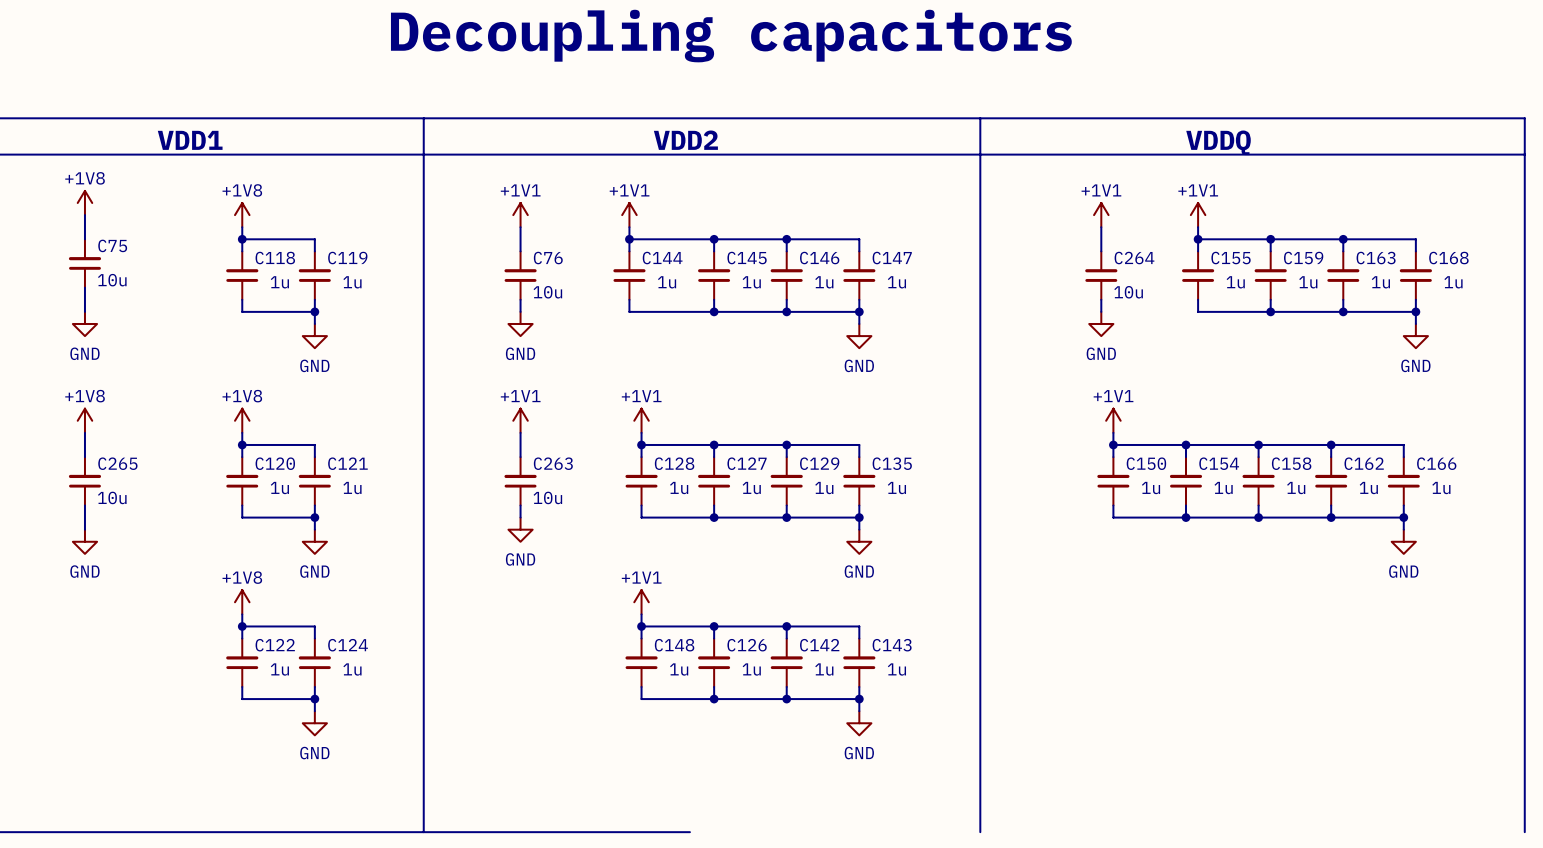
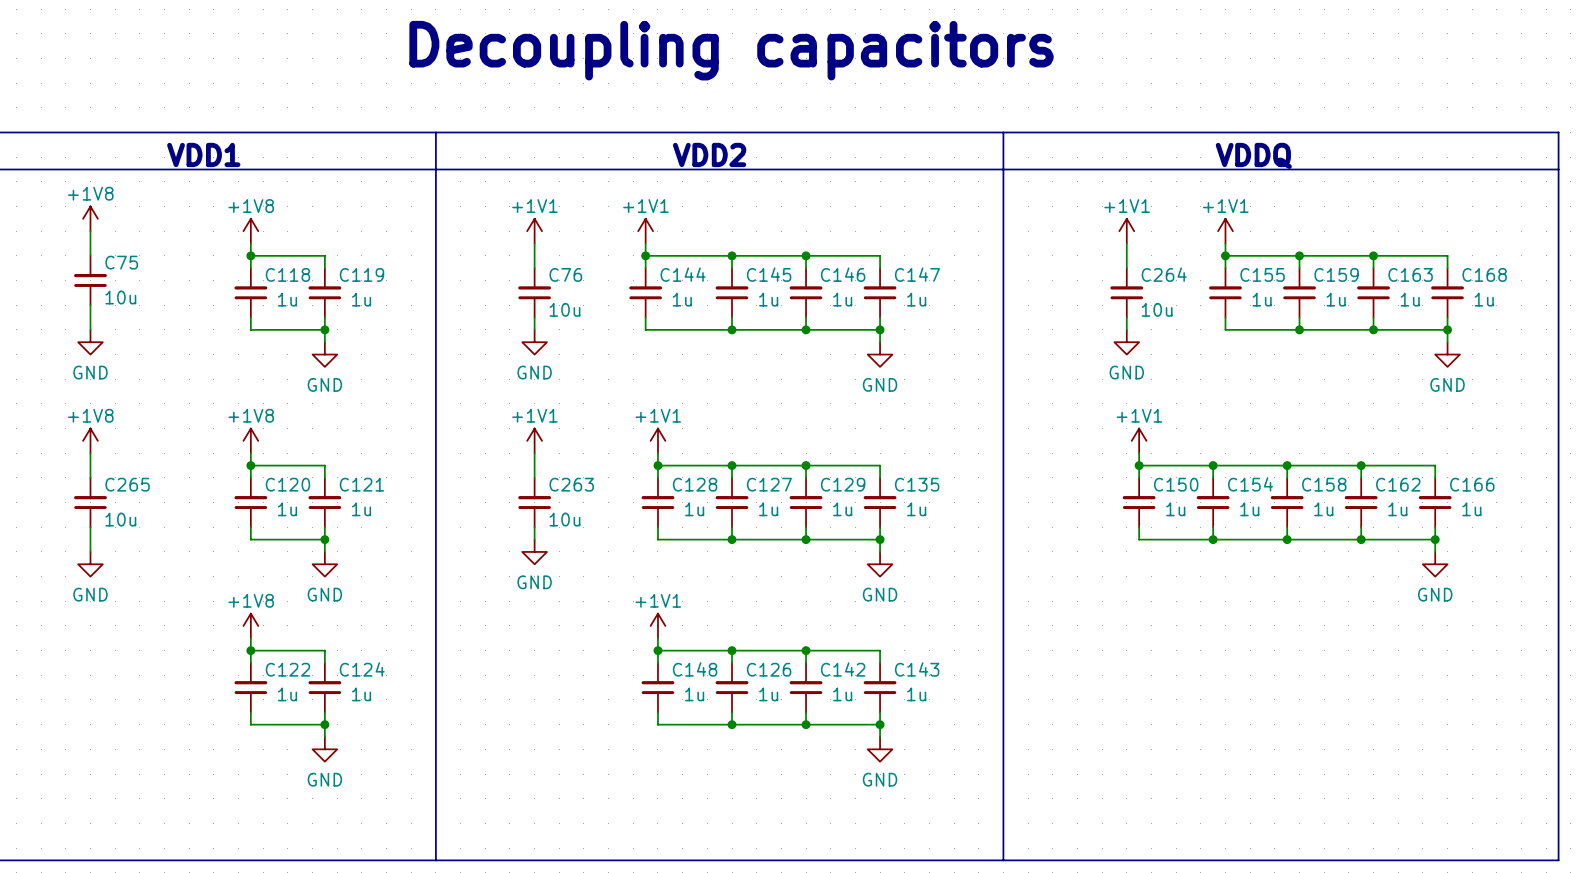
line: none -> (707, 860) (1558, 860)

